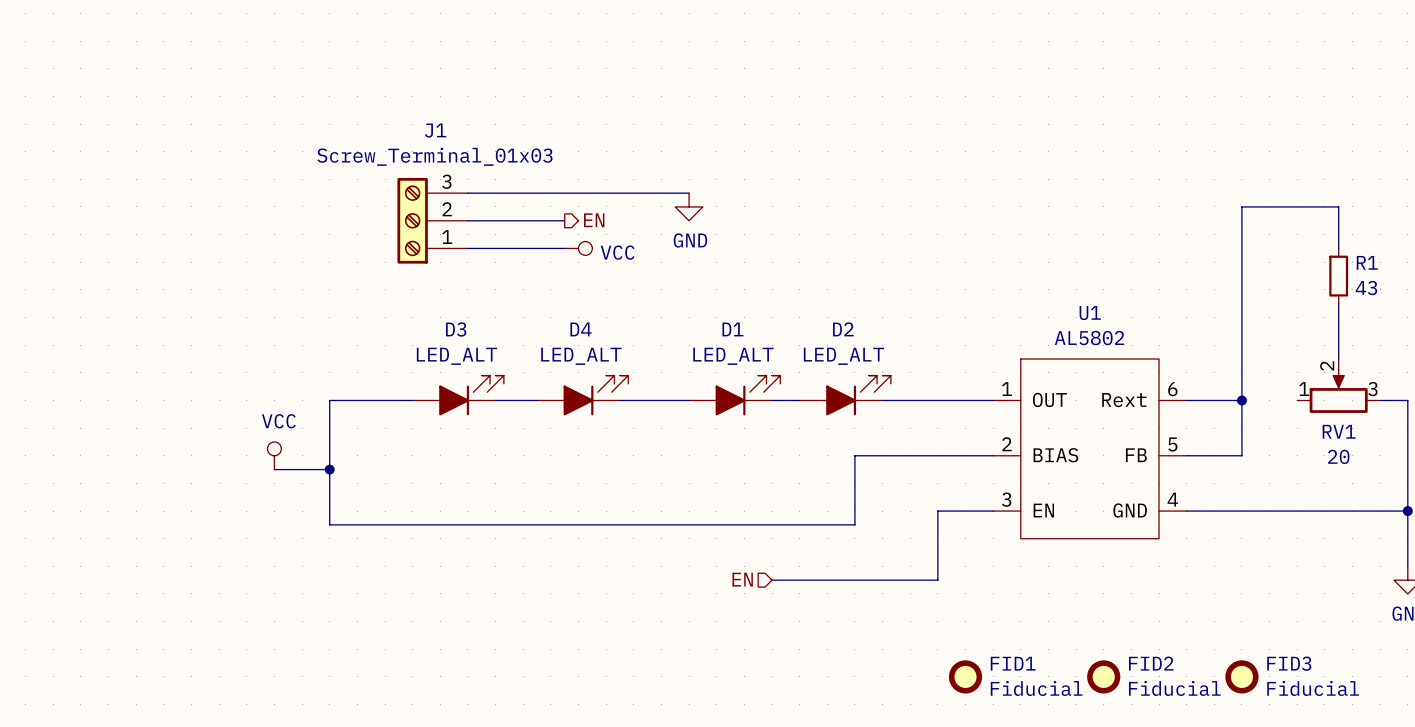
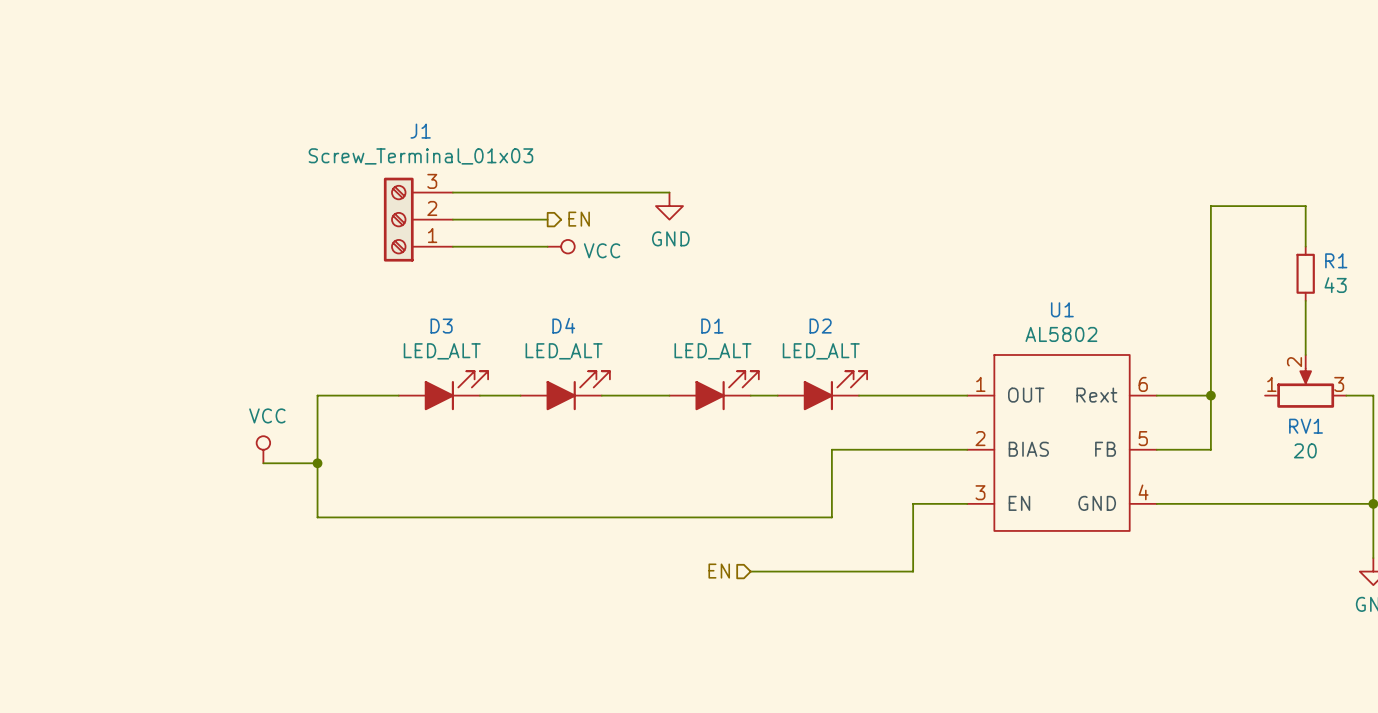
FID1: Fiducial (965, 676) -> none
FID2: Fiducial (1103, 676) -> none
FID3: Fiducial (1241, 676) -> none

